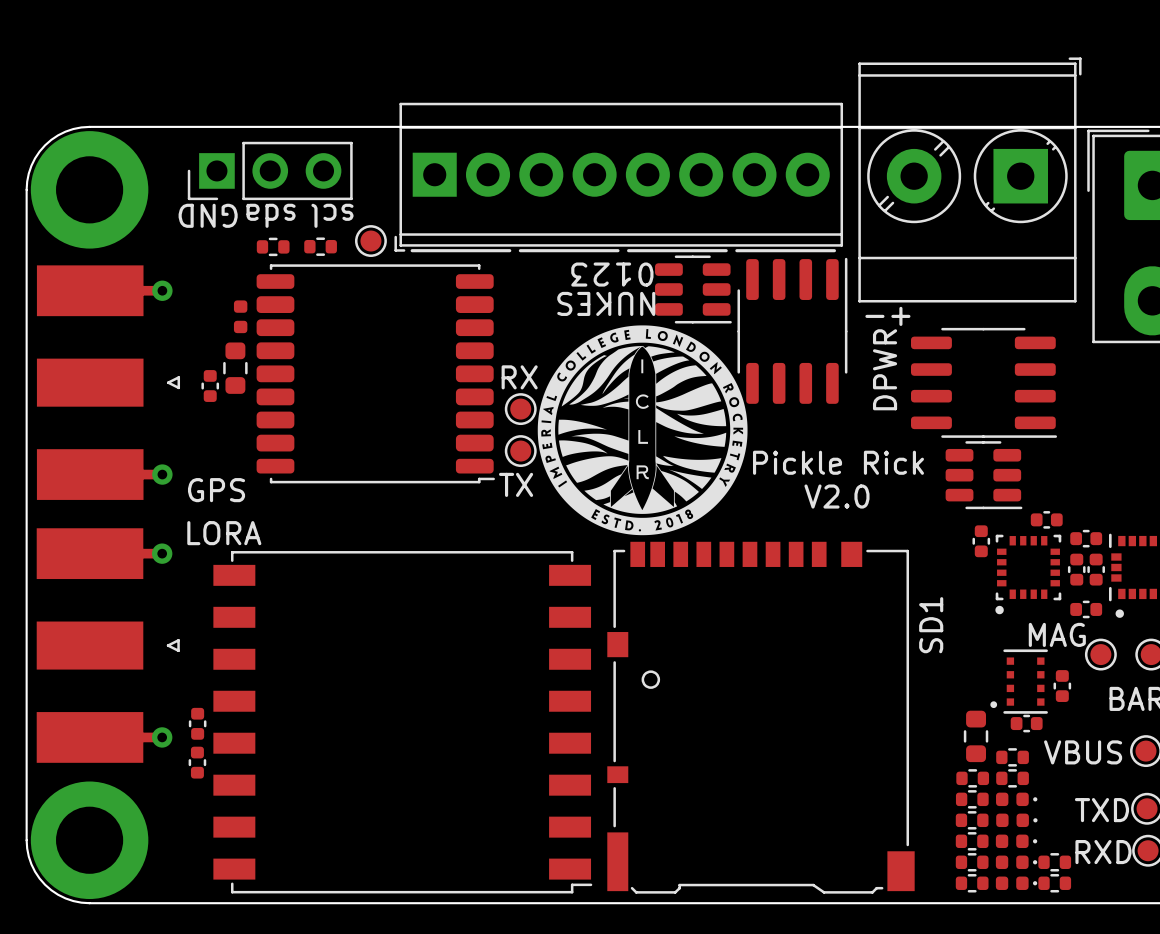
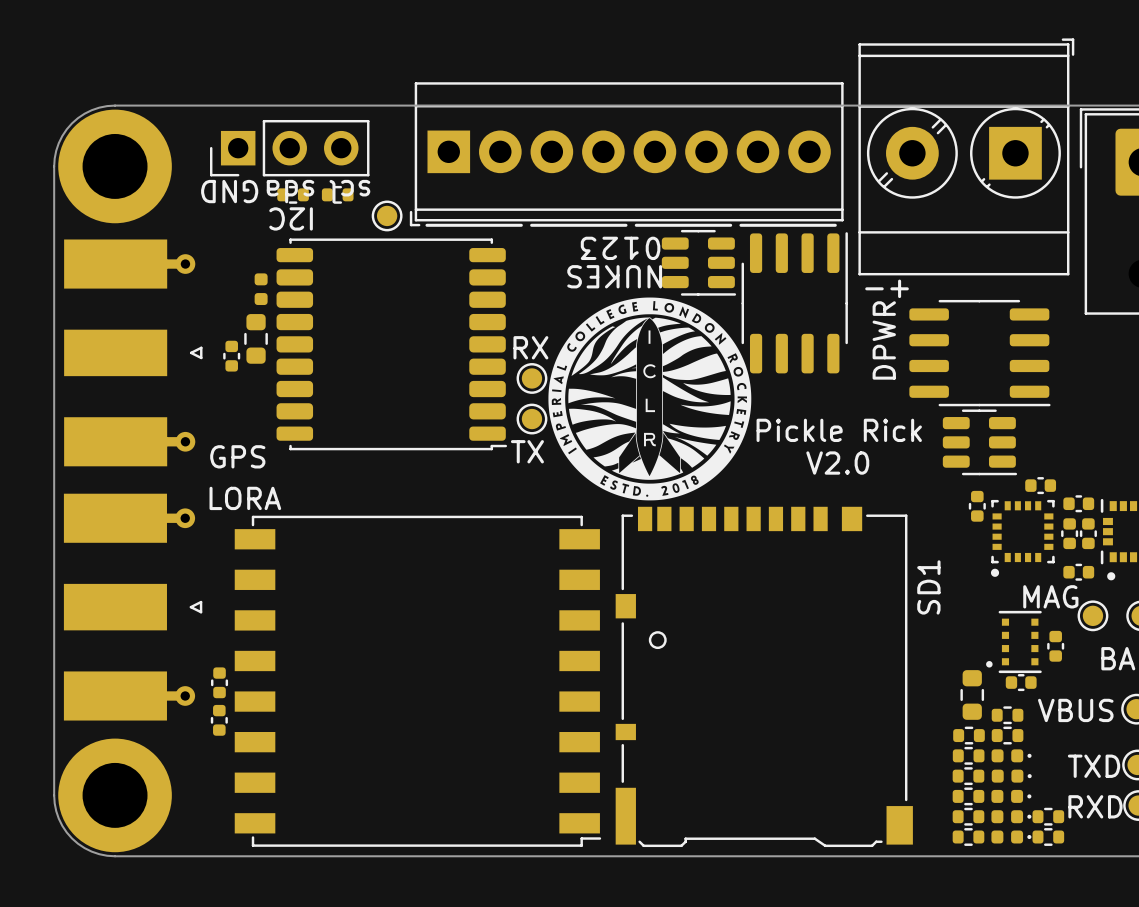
part: none -> (293, 194)
part: none -> (337, 194)
text: none -> I2C (291, 218)
part: (273, 246) -> none
part: (320, 246) -> none

